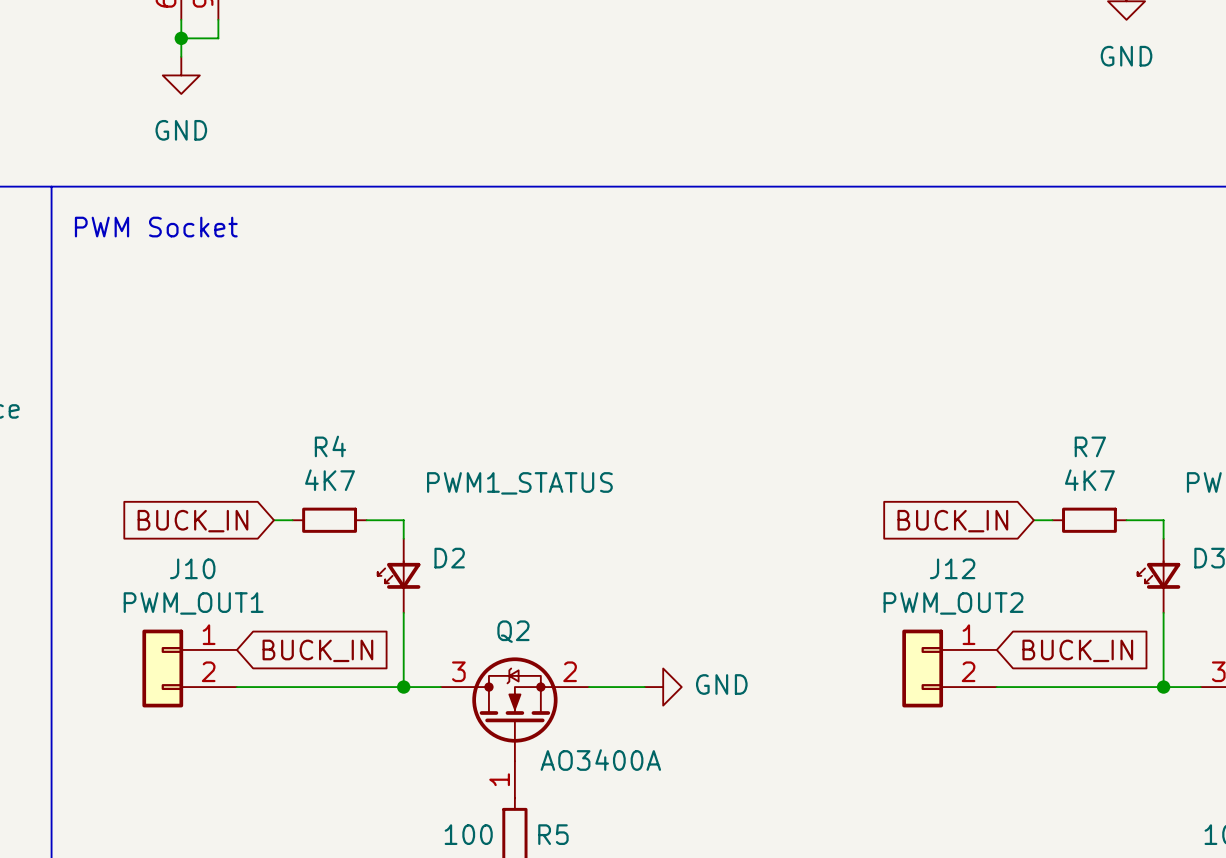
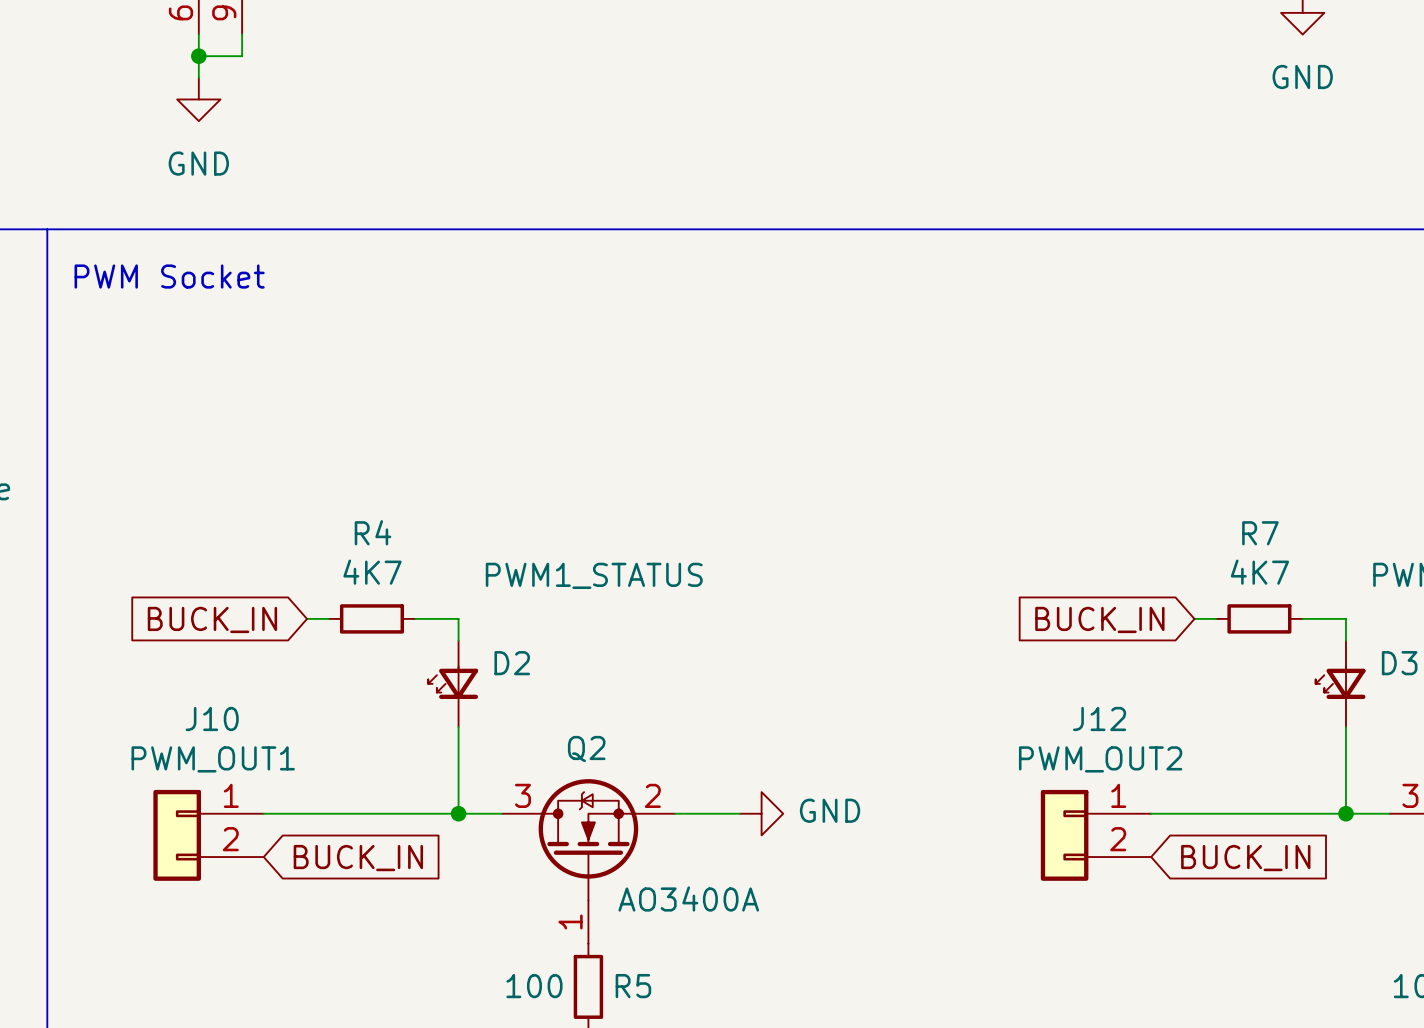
global label position: BUCK_IN (317, 650) -> BUCK_IN (358, 858)
global label position: BUCK_IN (1077, 650) -> BUCK_IN (1245, 858)
J10 position: (189, 668) -> (208, 835)
J12 position: (949, 668) -> (1095, 835)

